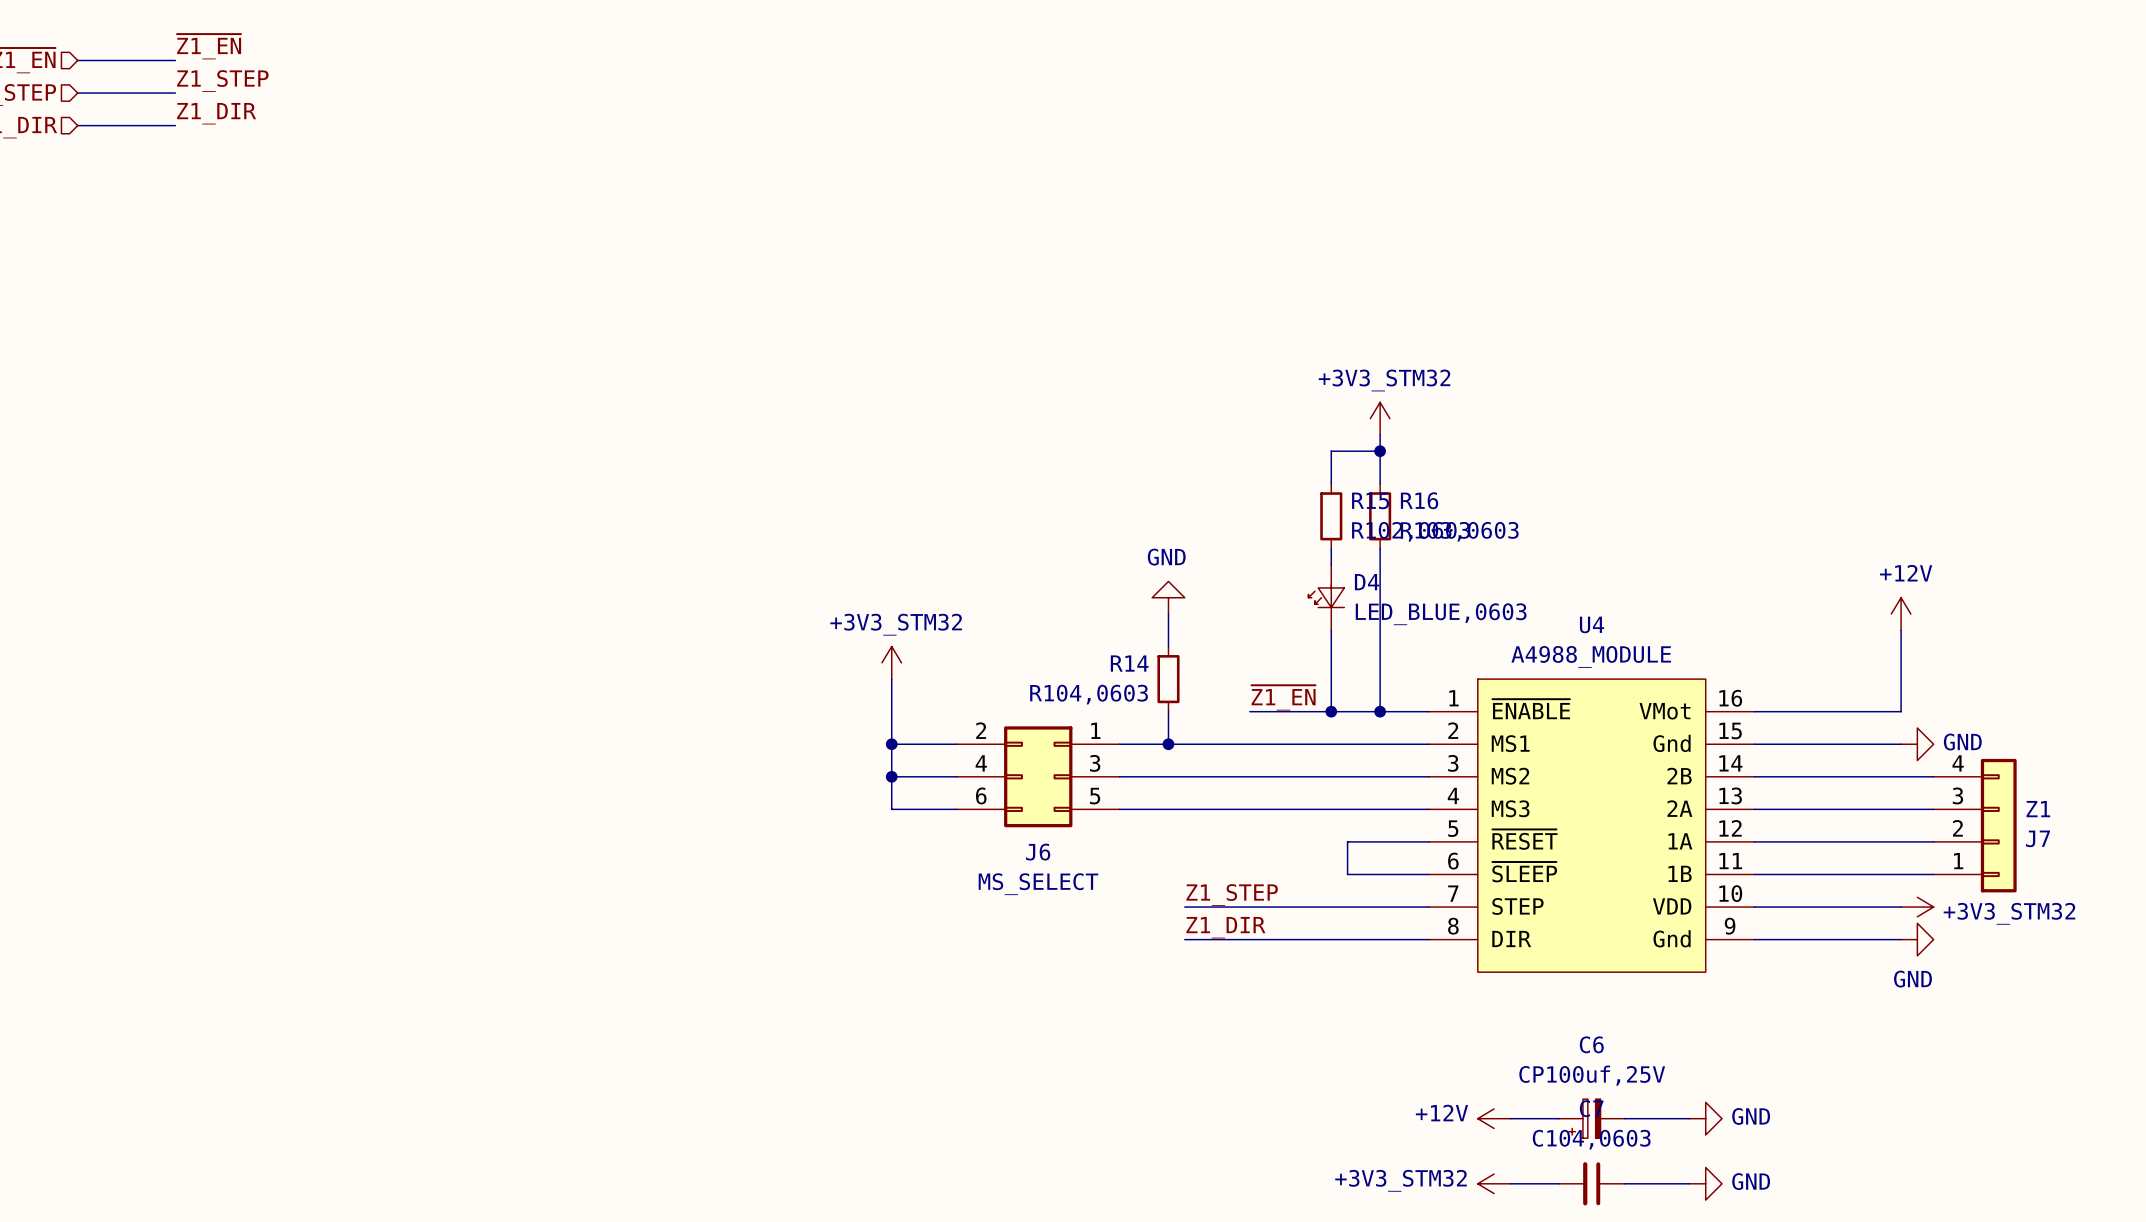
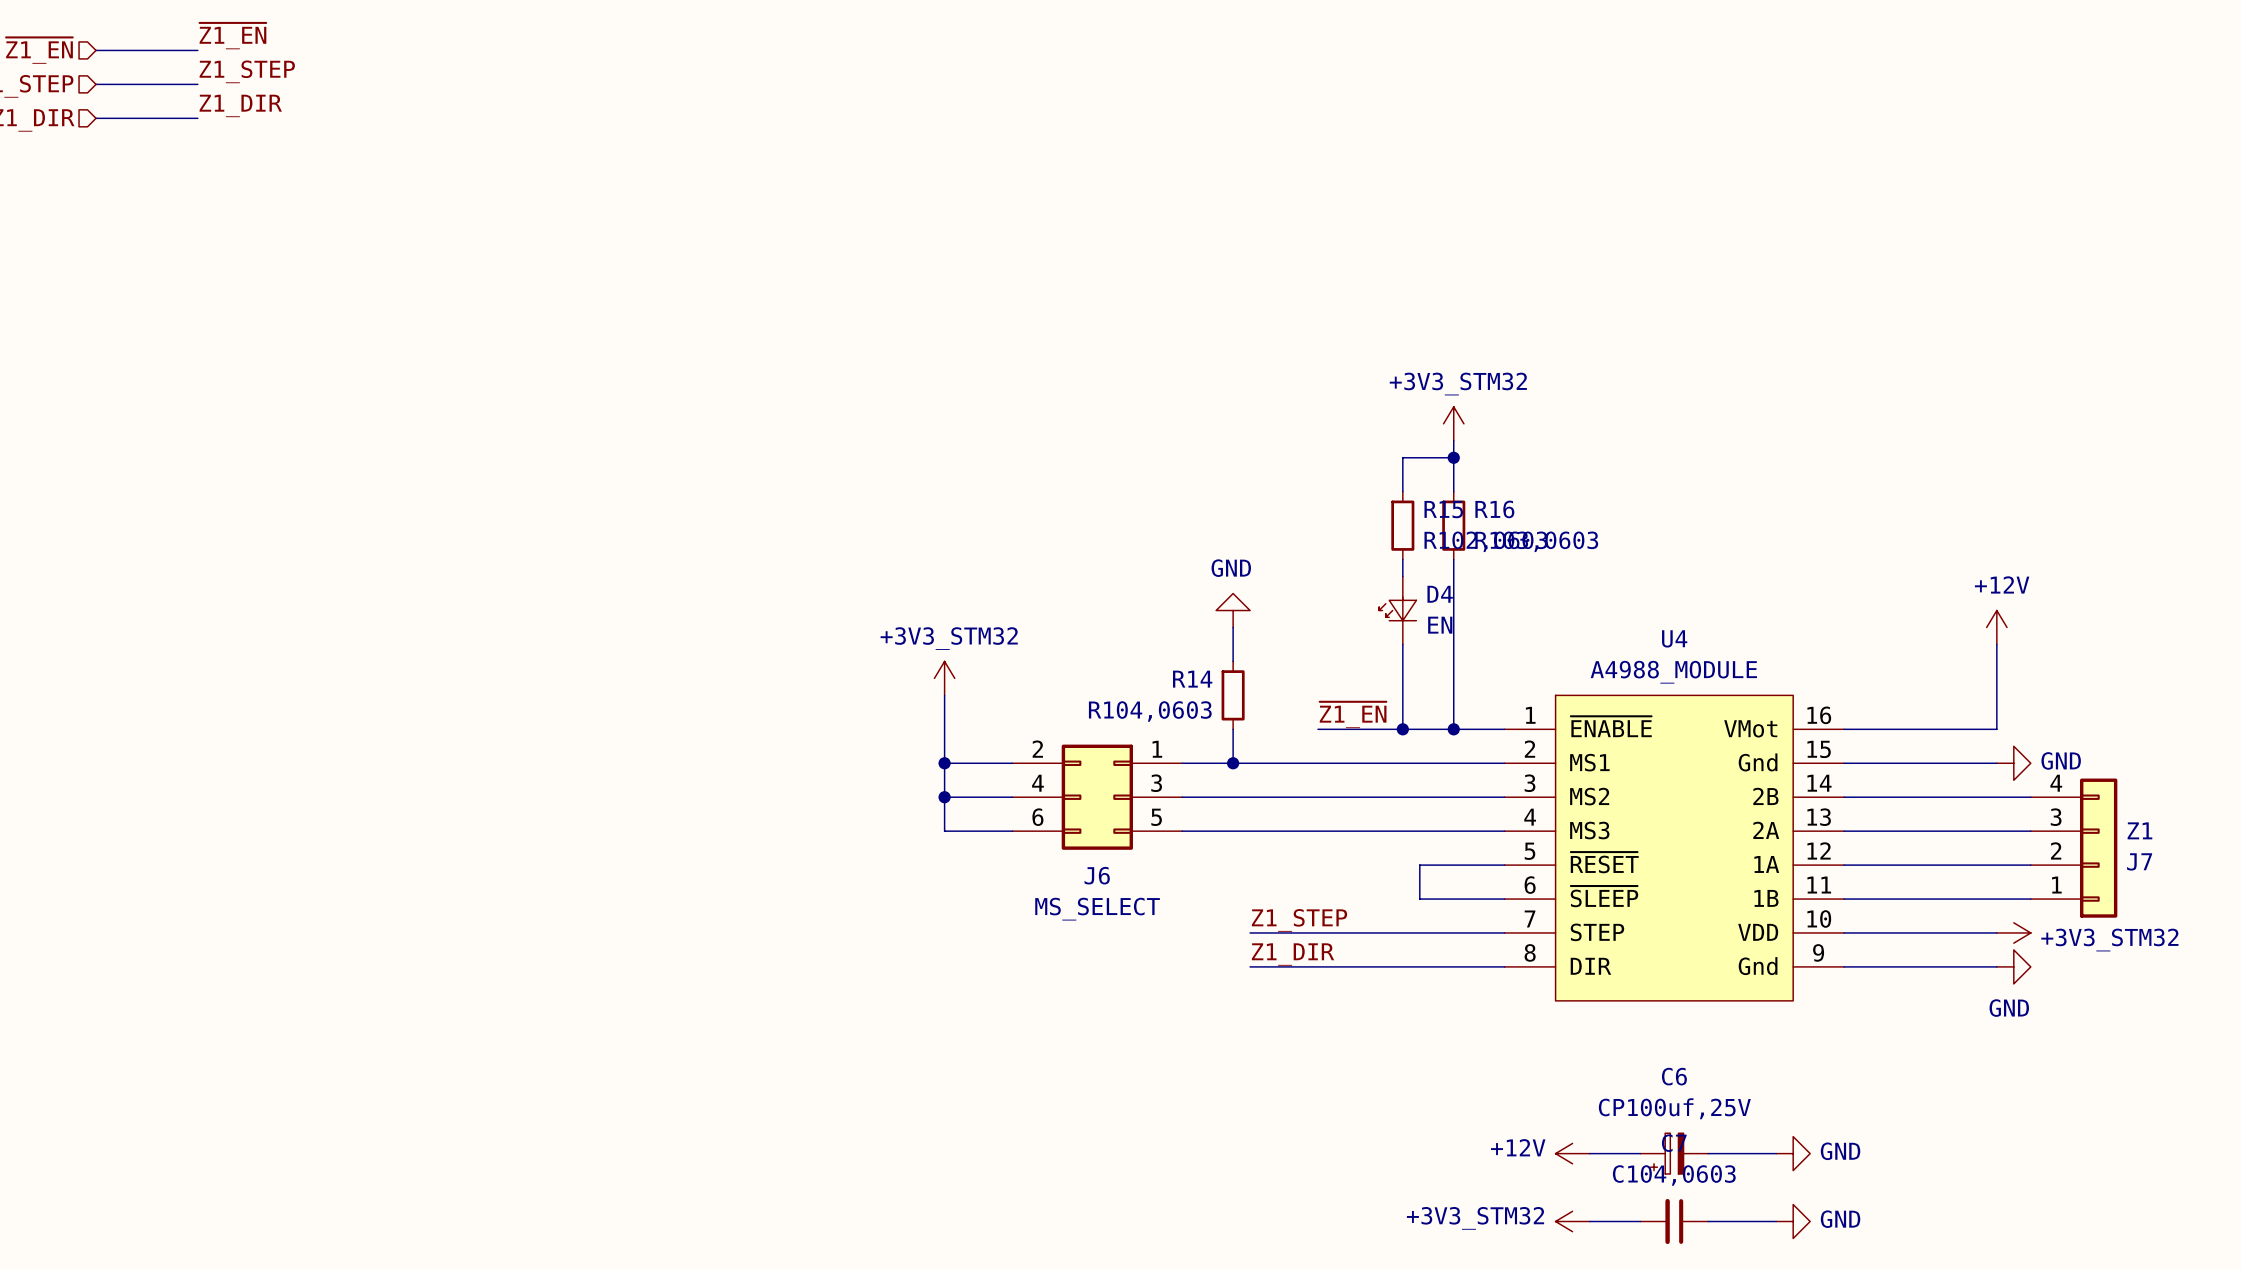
D4 value: LED_BLUE,0603 (1441, 614) -> EN (1440, 625)

